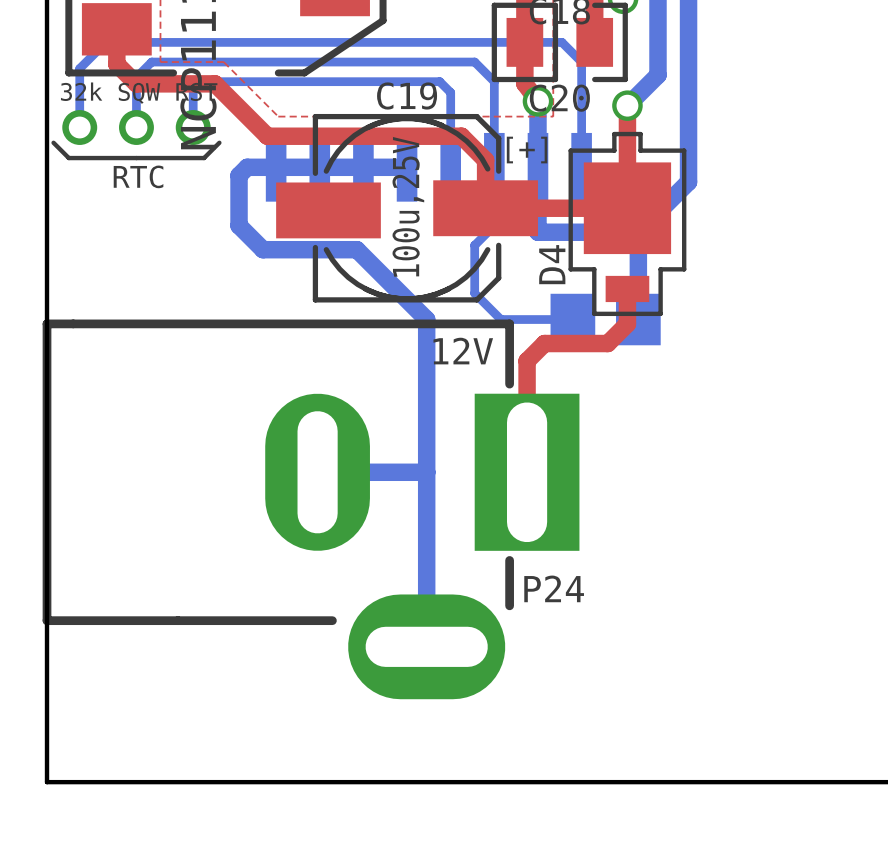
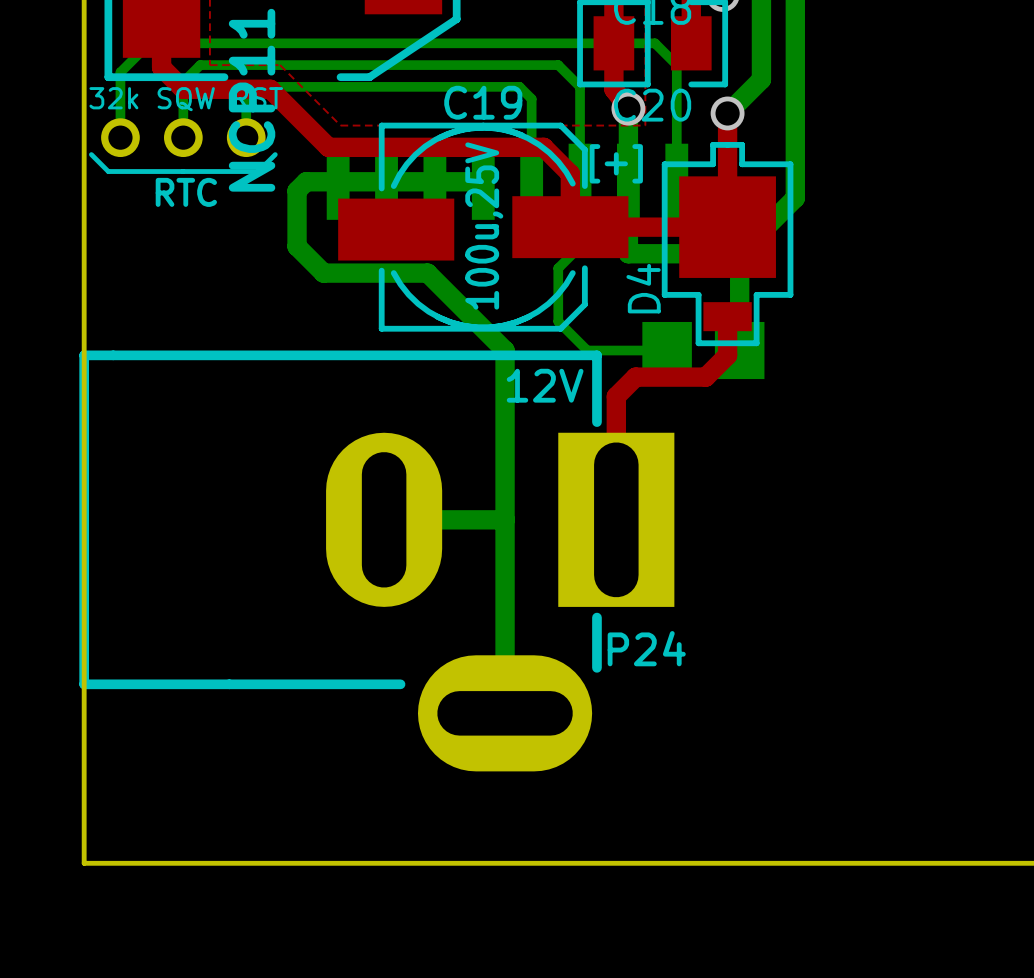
D4 footprint: [568, 131, 687, 317] -> [661, 142, 794, 347]

